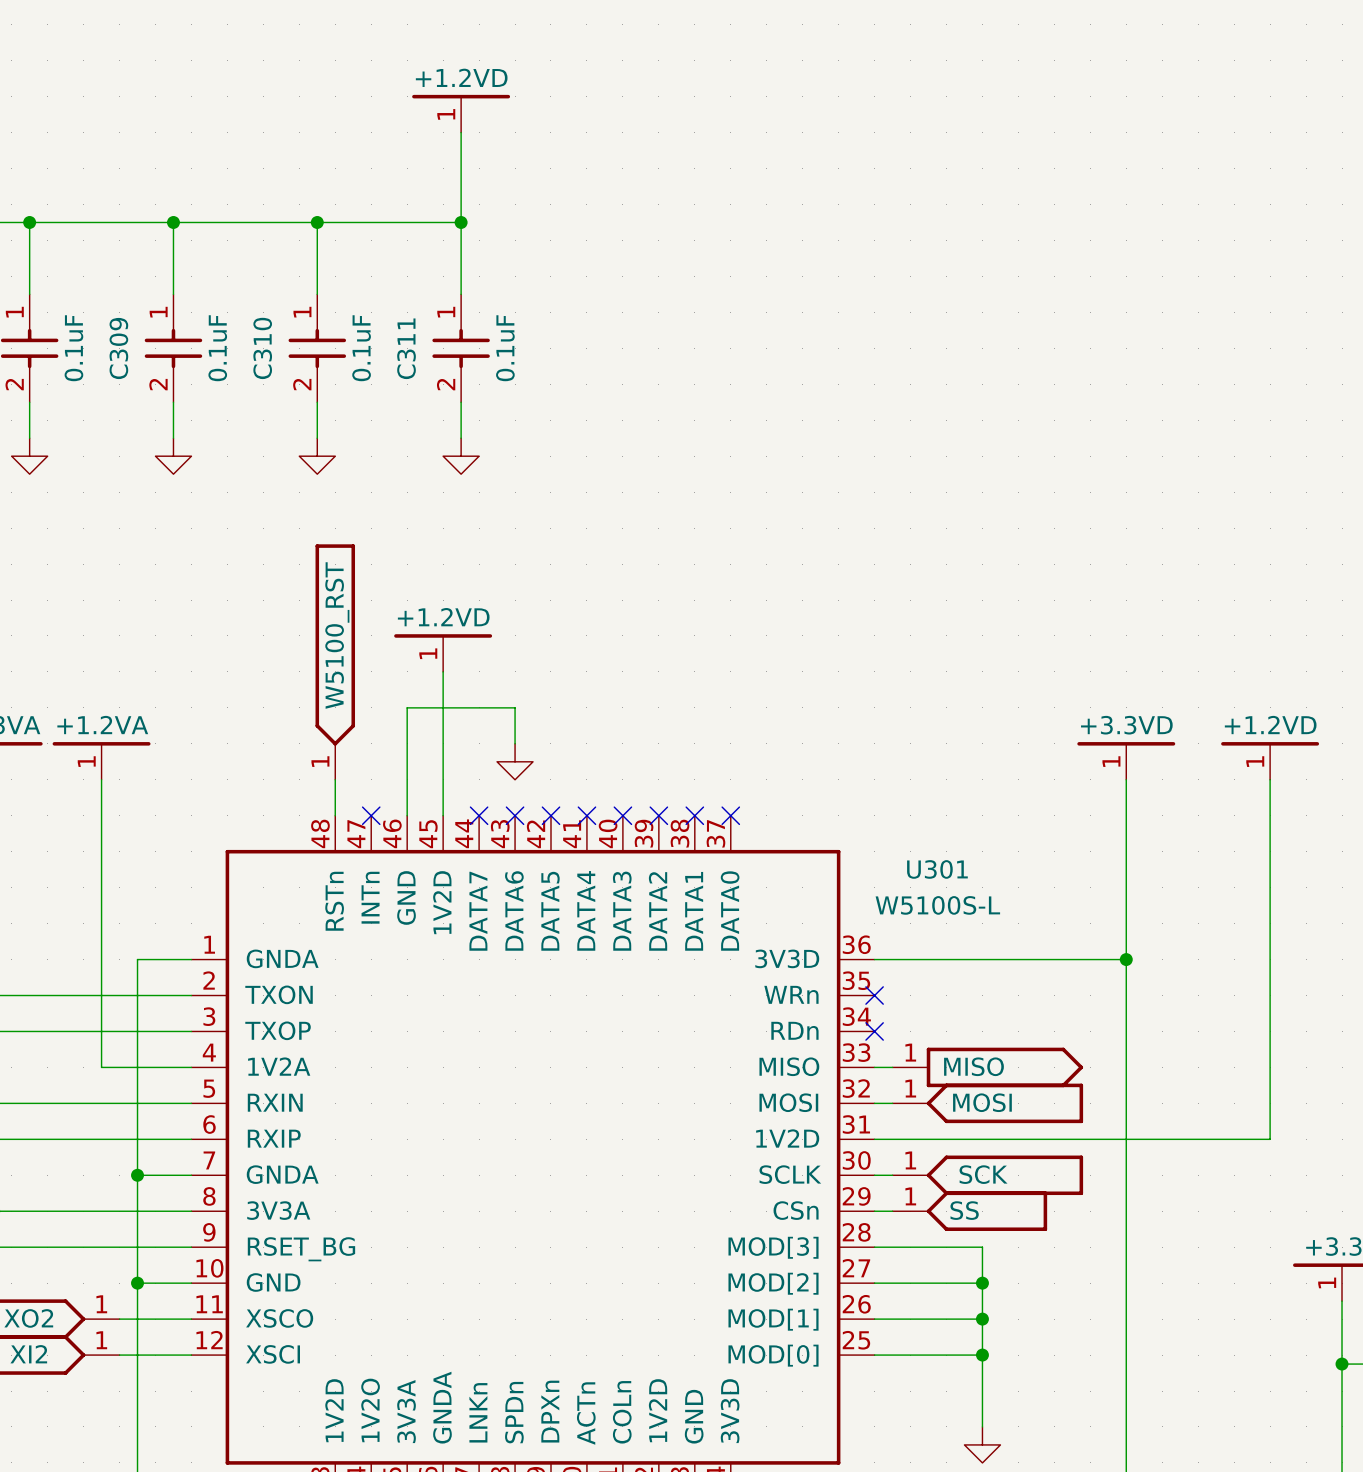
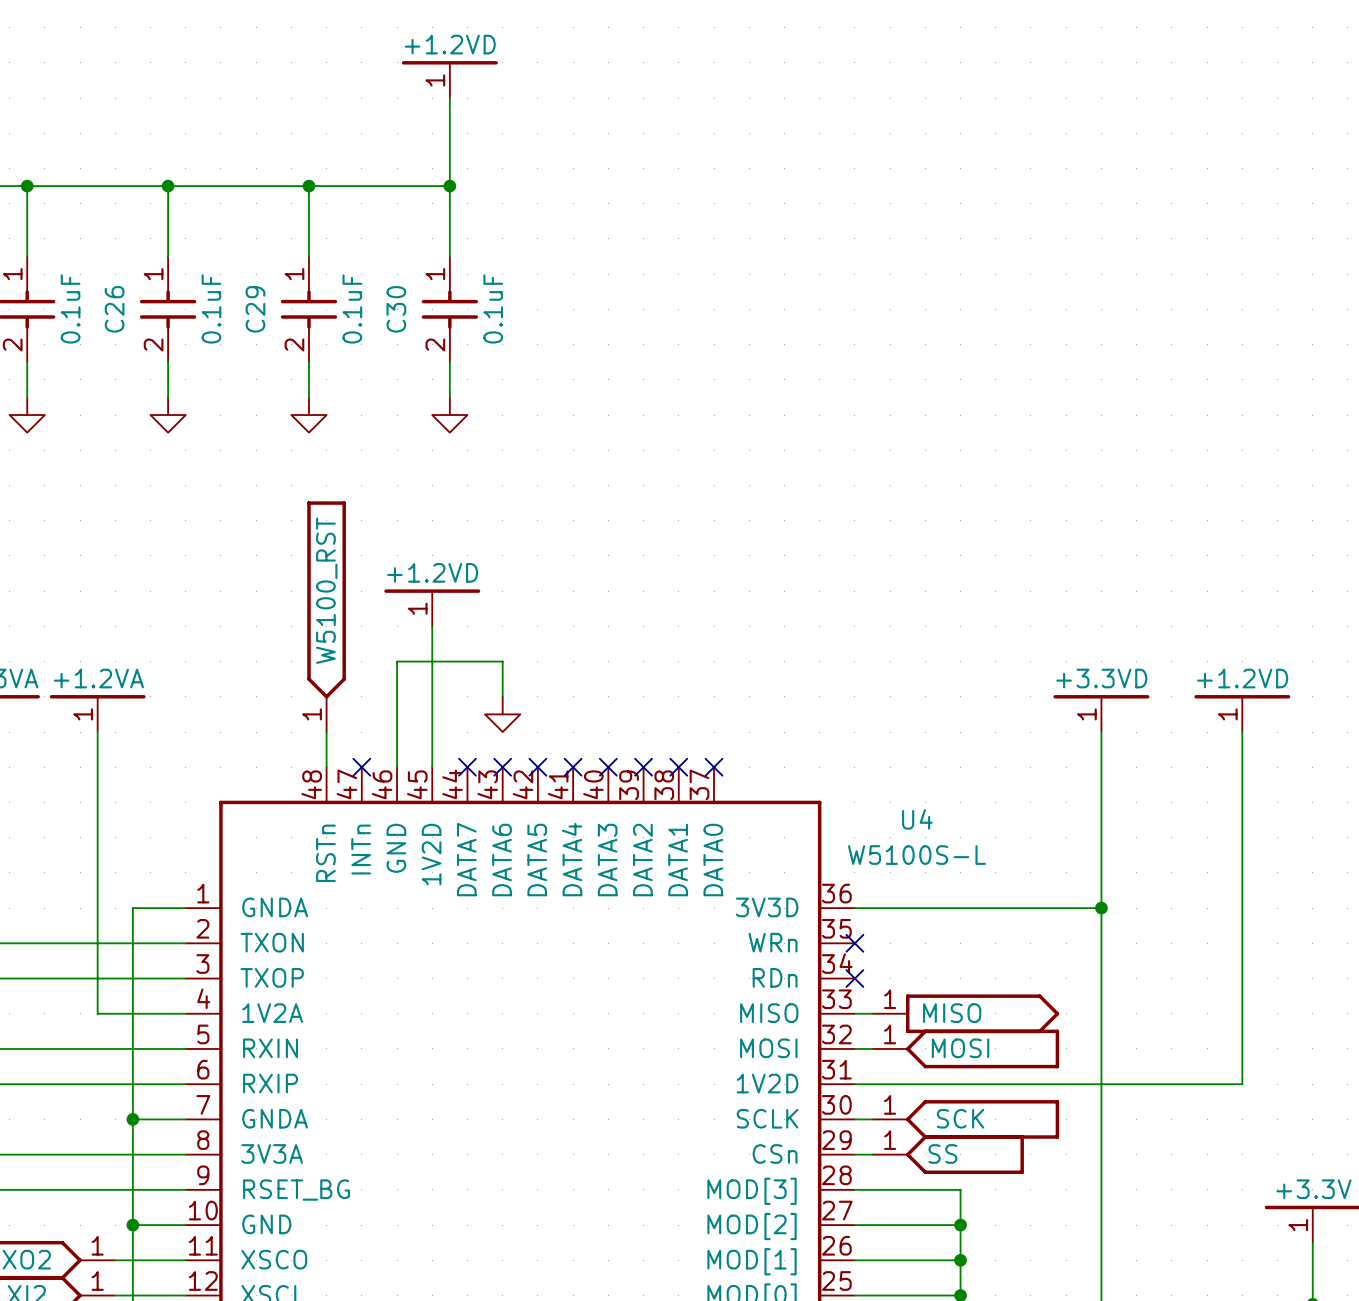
C309 name: C309 (118, 348) -> C26 (114, 309)
C310 name: C310 (262, 348) -> C29 (255, 309)
C311 name: C311 (406, 348) -> C30 (396, 309)
U301 name: U301 (937, 869) -> U4 (917, 819)

